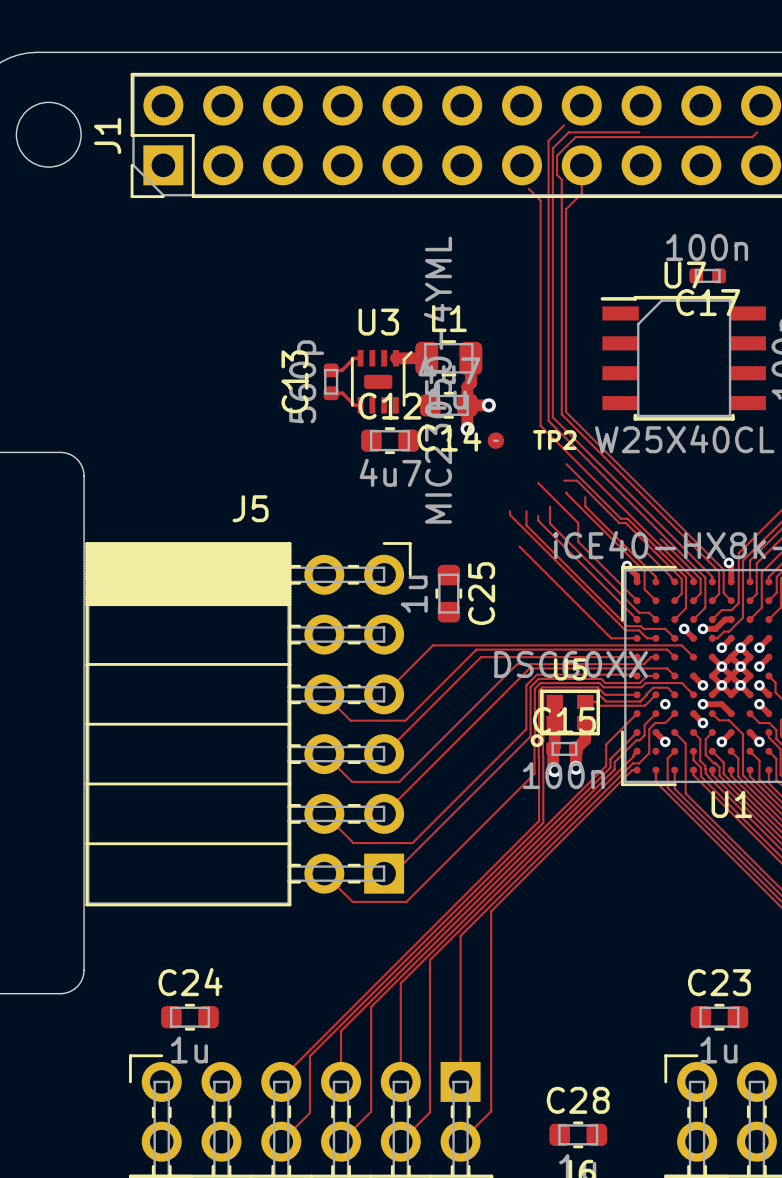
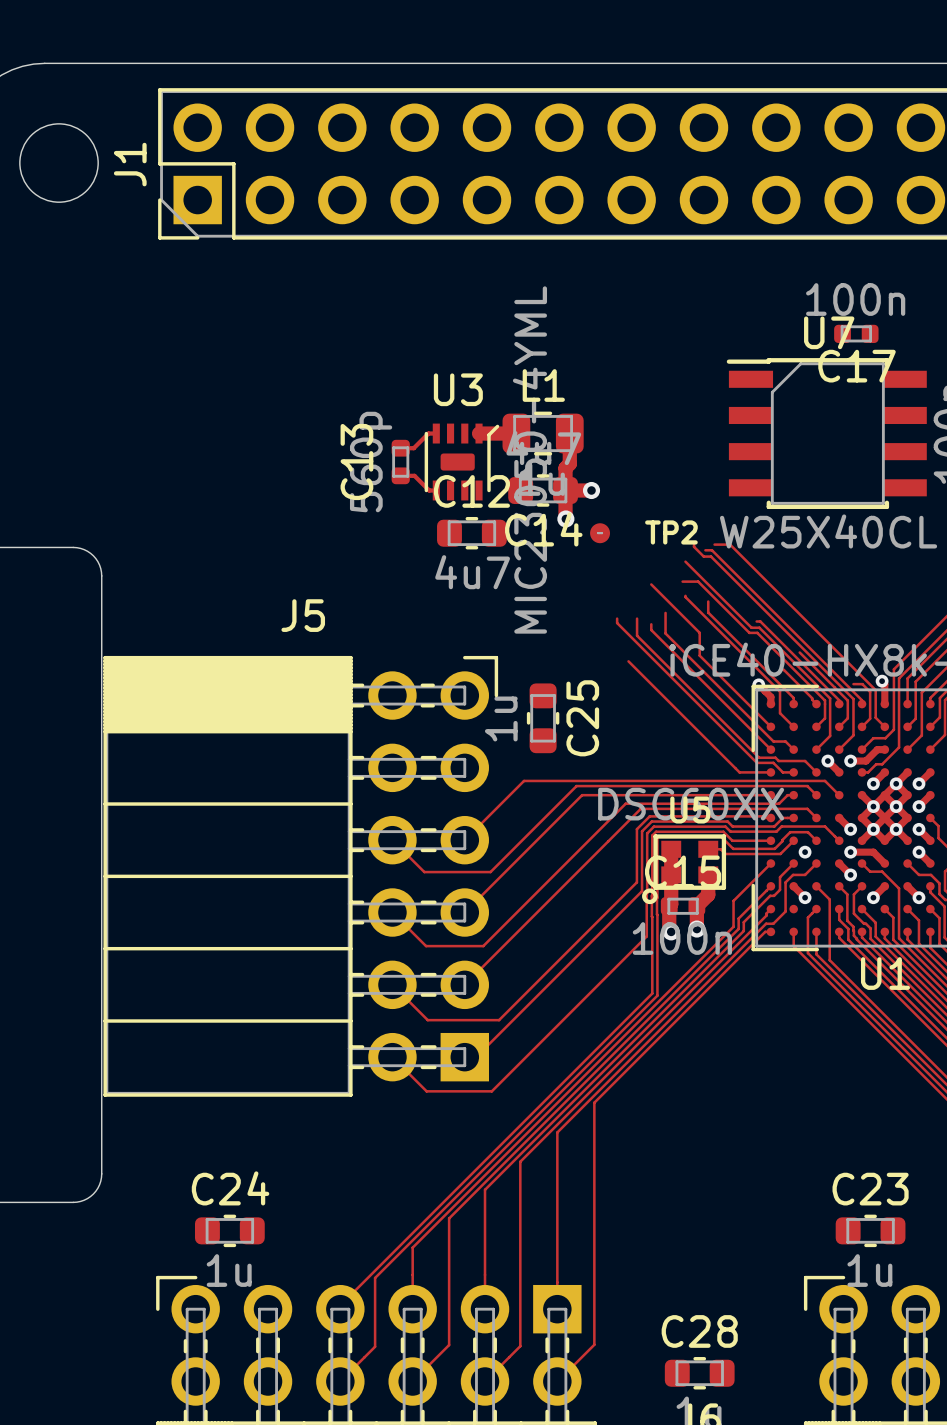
track: (564, 125) (548, 140) (548, 420) (587, 459) -> (694, 544) (703, 556) (711, 556)
track: (639, 132) (568, 132) (552, 148) (552, 417) (712, 578) -> (705, 550) (711, 550) (862, 700)
track: (757, 132) (752, 137) (575, 137) (557, 155) (557, 174) (561, 179) (561, 414) (712, 565) -> (853, 684) (862, 684)
track: (581, 165) (581, 193) (566, 209) (566, 411) (723, 570) -> (714, 544) (730, 544) (875, 690)
track: (528, 188) (540, 200) (540, 425) (628, 513) -> (756, 621) (760, 621)

